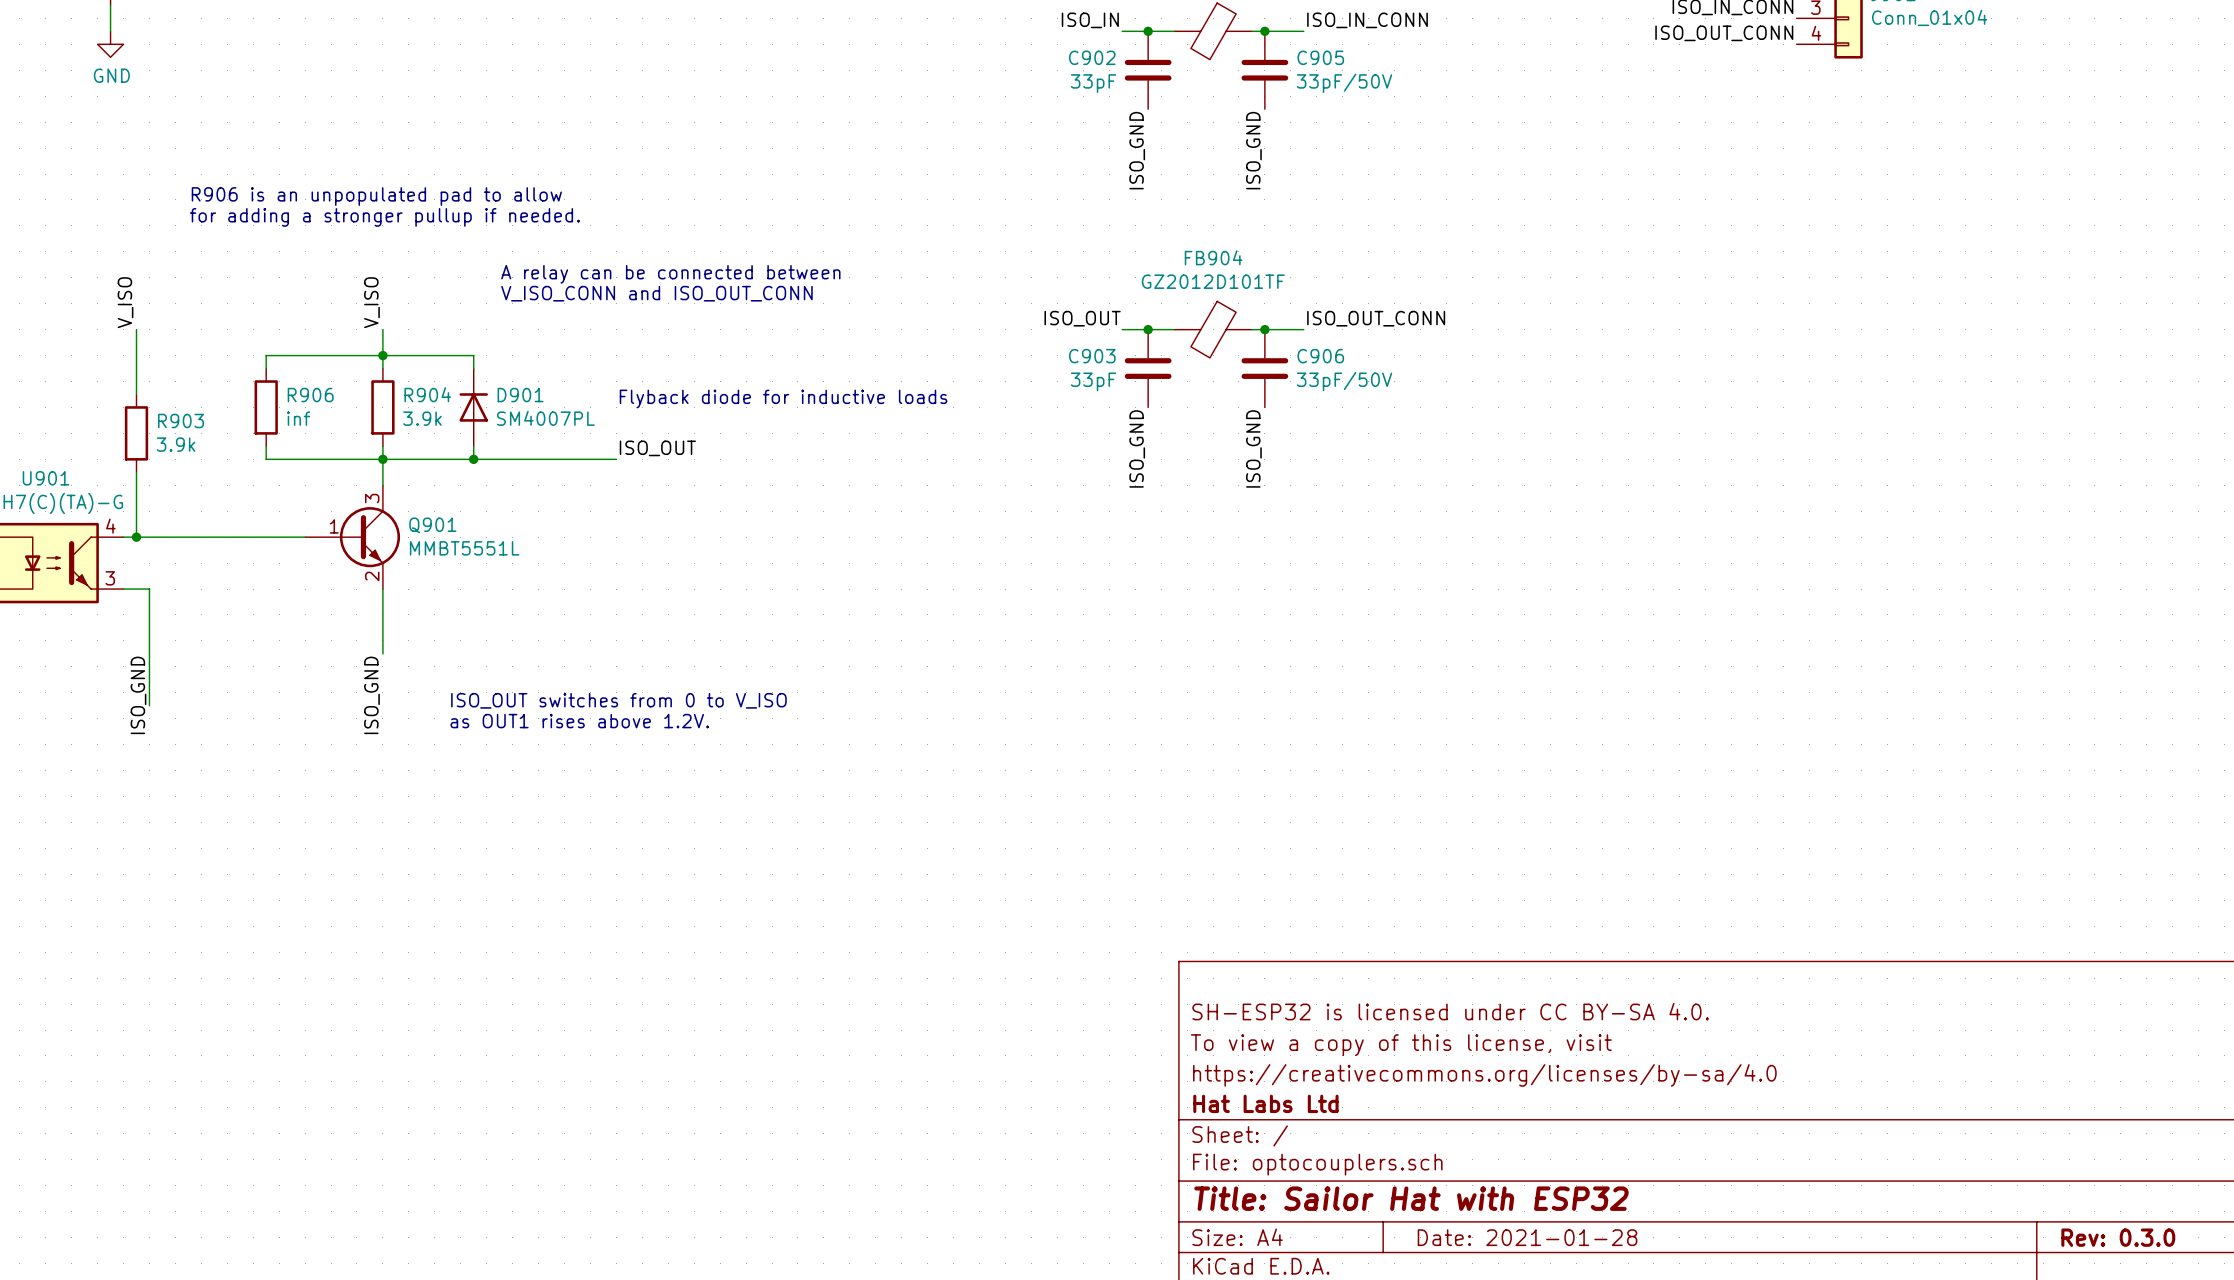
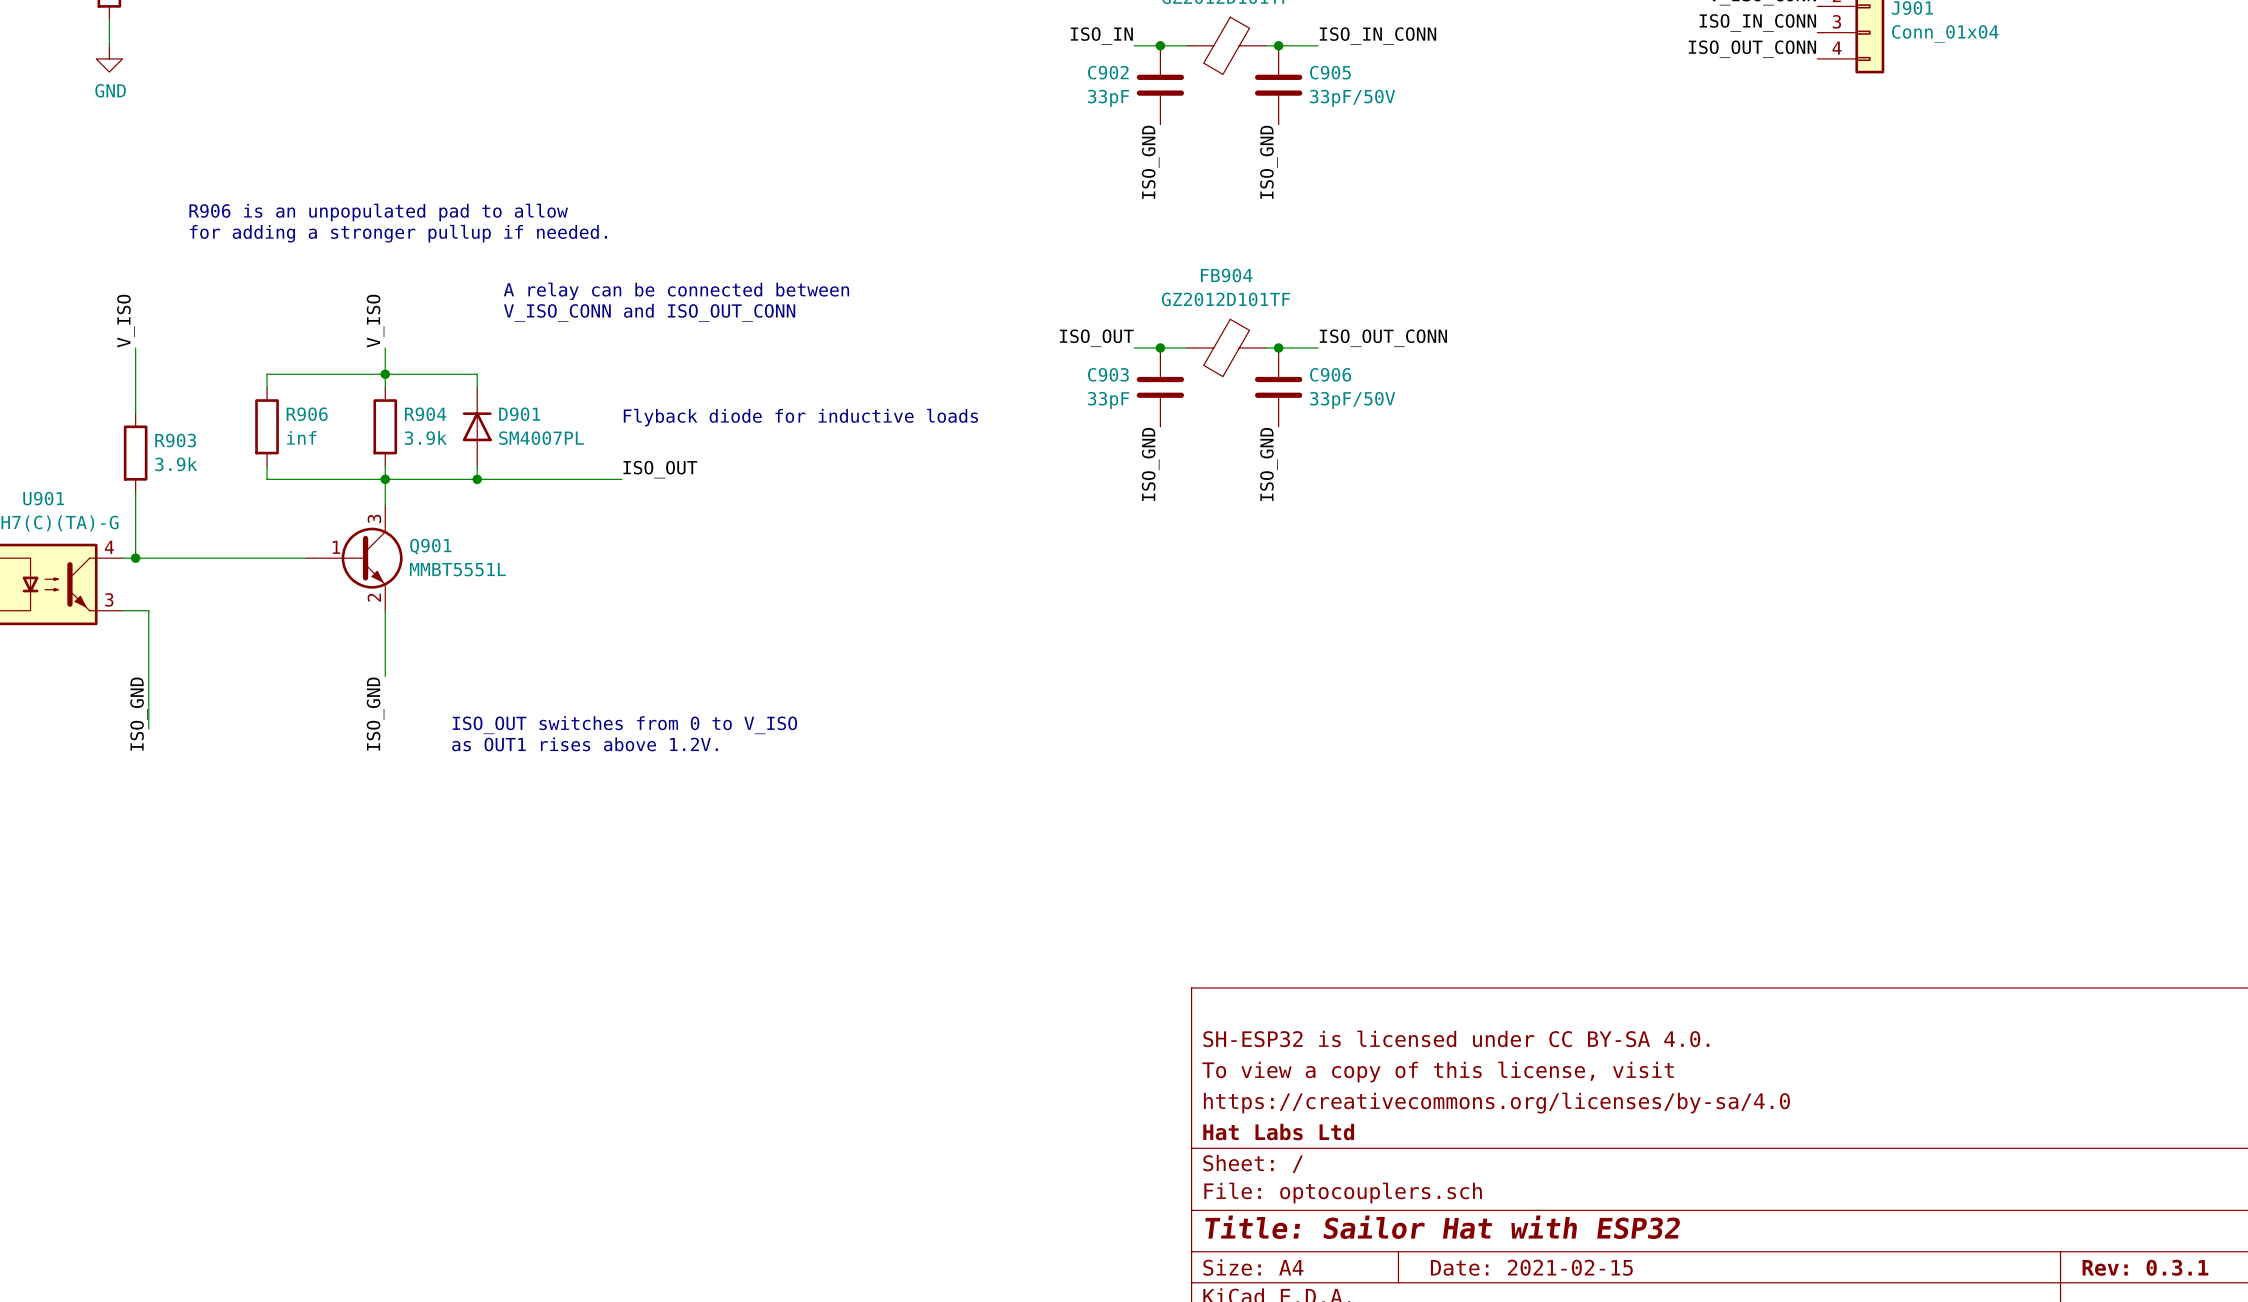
title block: Date: 2021-01-28 (1527, 1237) -> Date: 2021-02-15 (1531, 1267)
title block: Rev: 0.3.0 (2118, 1237) -> Rev: 0.3.1 (2145, 1267)

